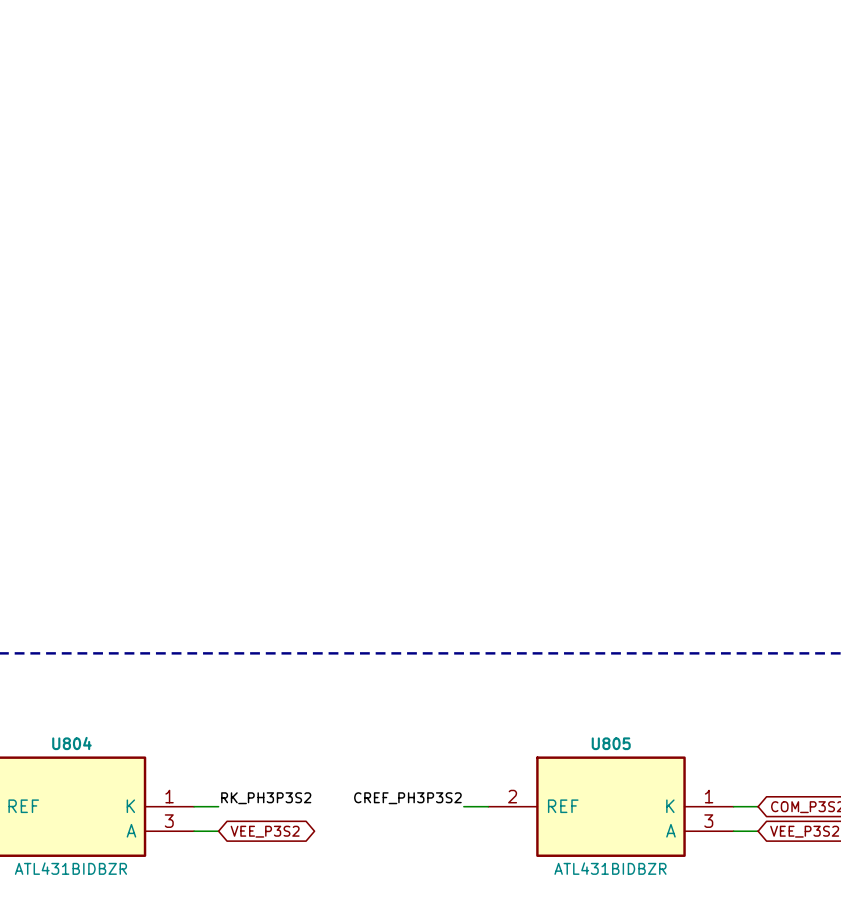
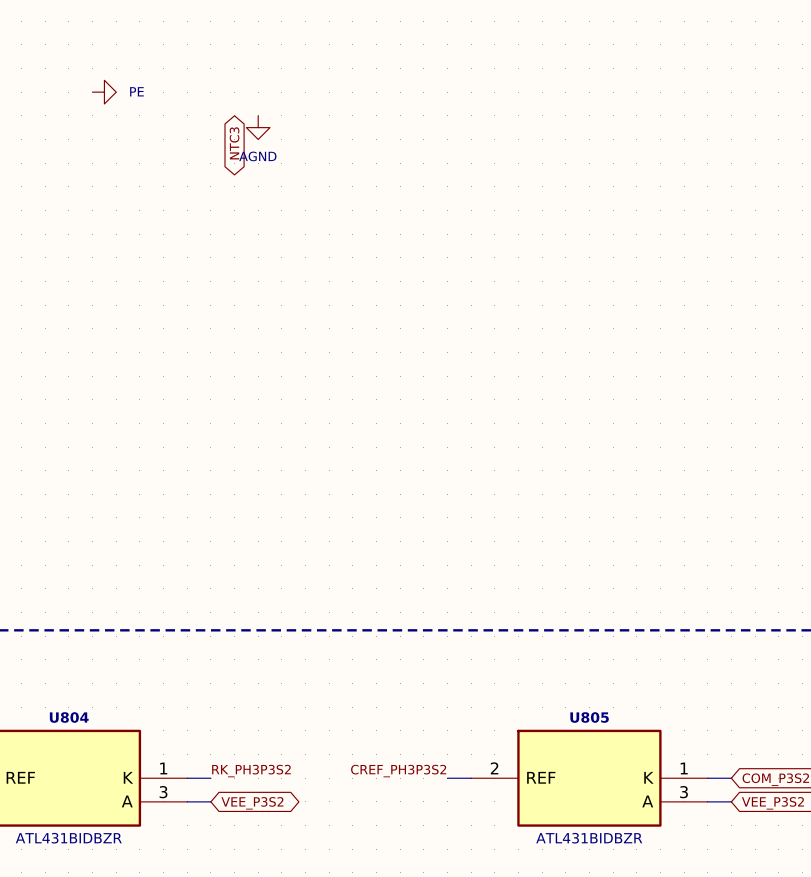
power symbol: none -> PE (104, 92)
power symbol: none -> AGND (258, 127)
global label: none -> NTC3 (234, 143)

